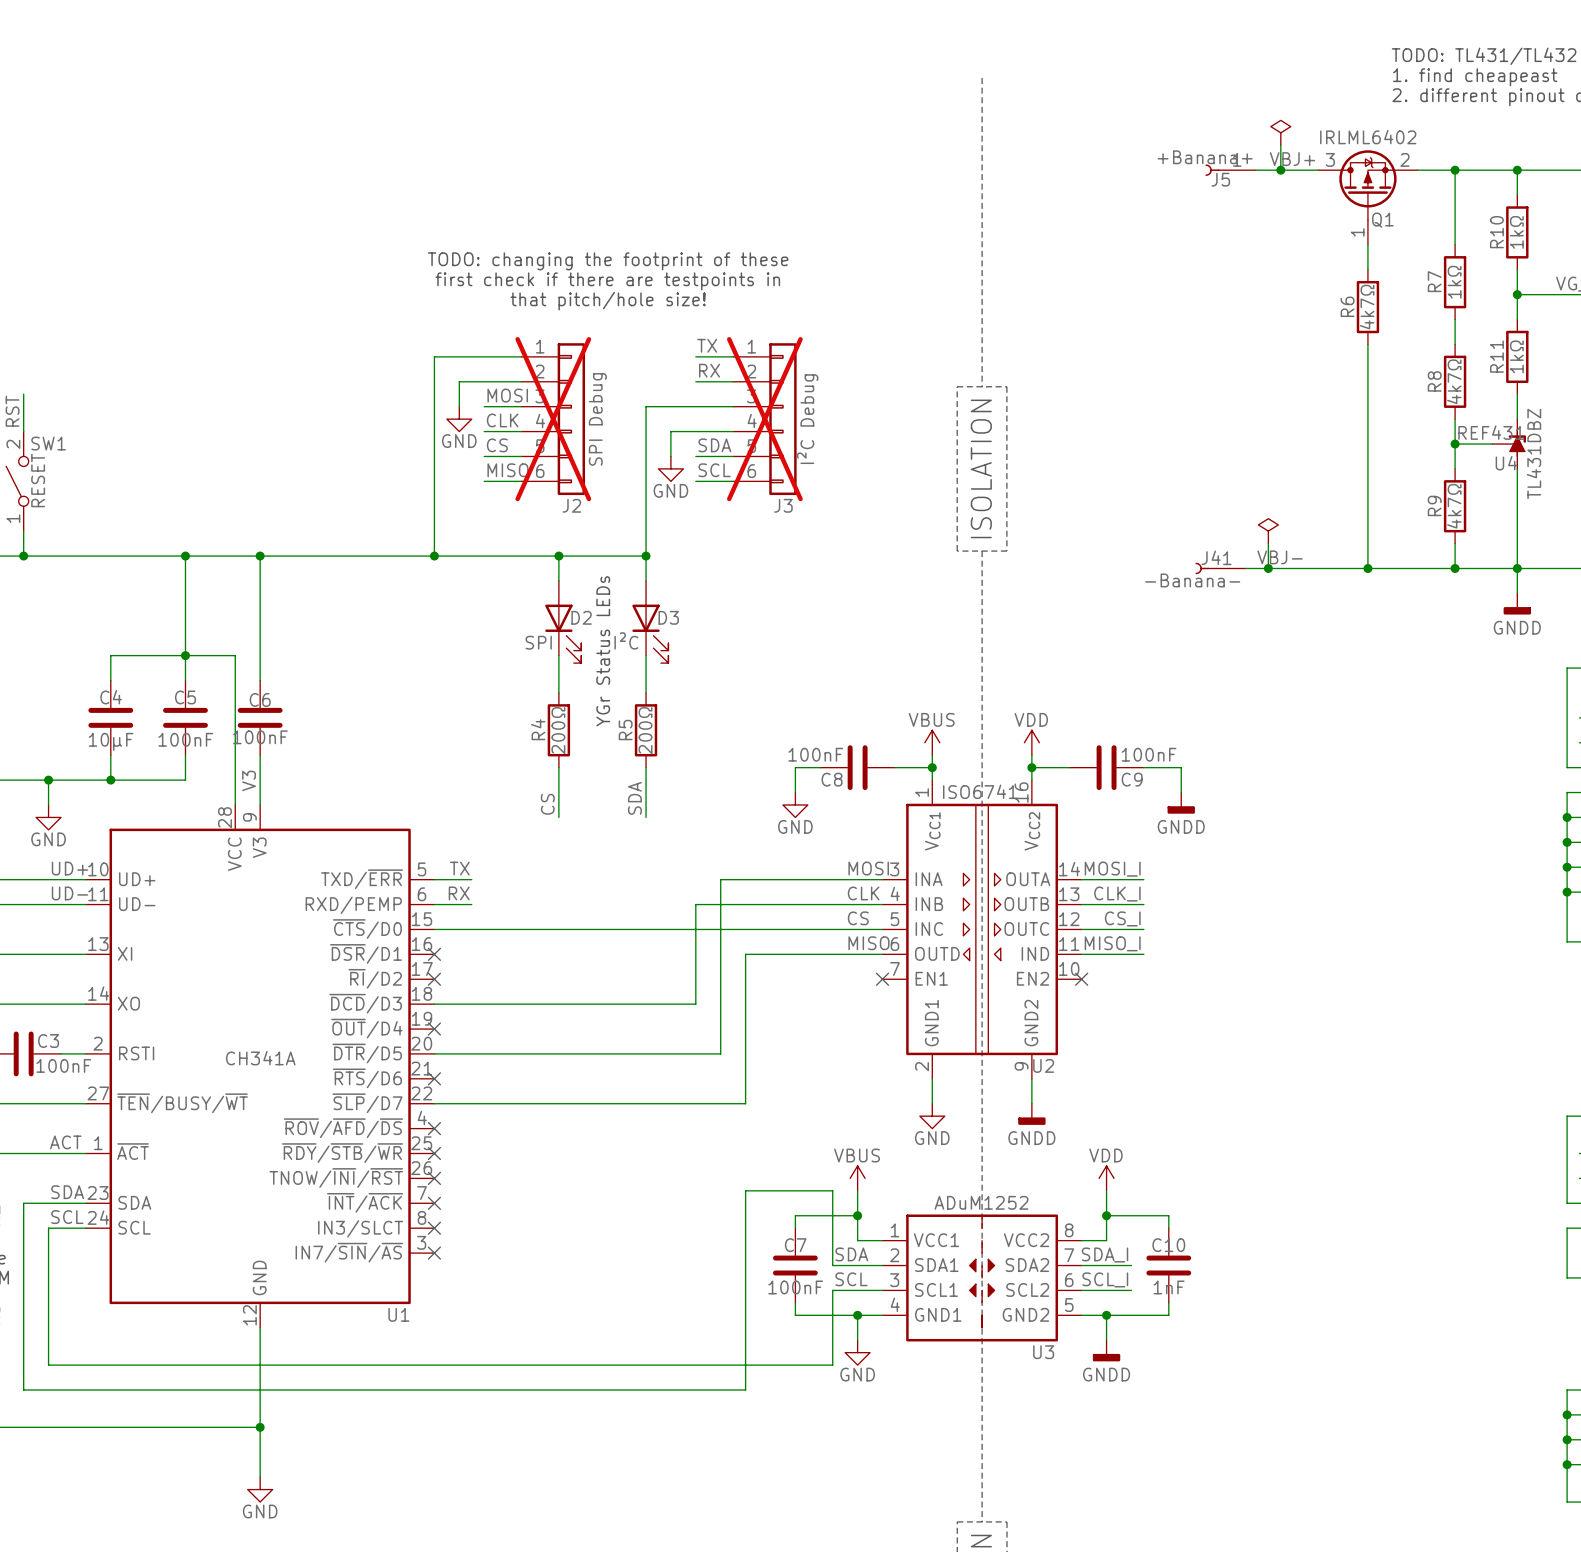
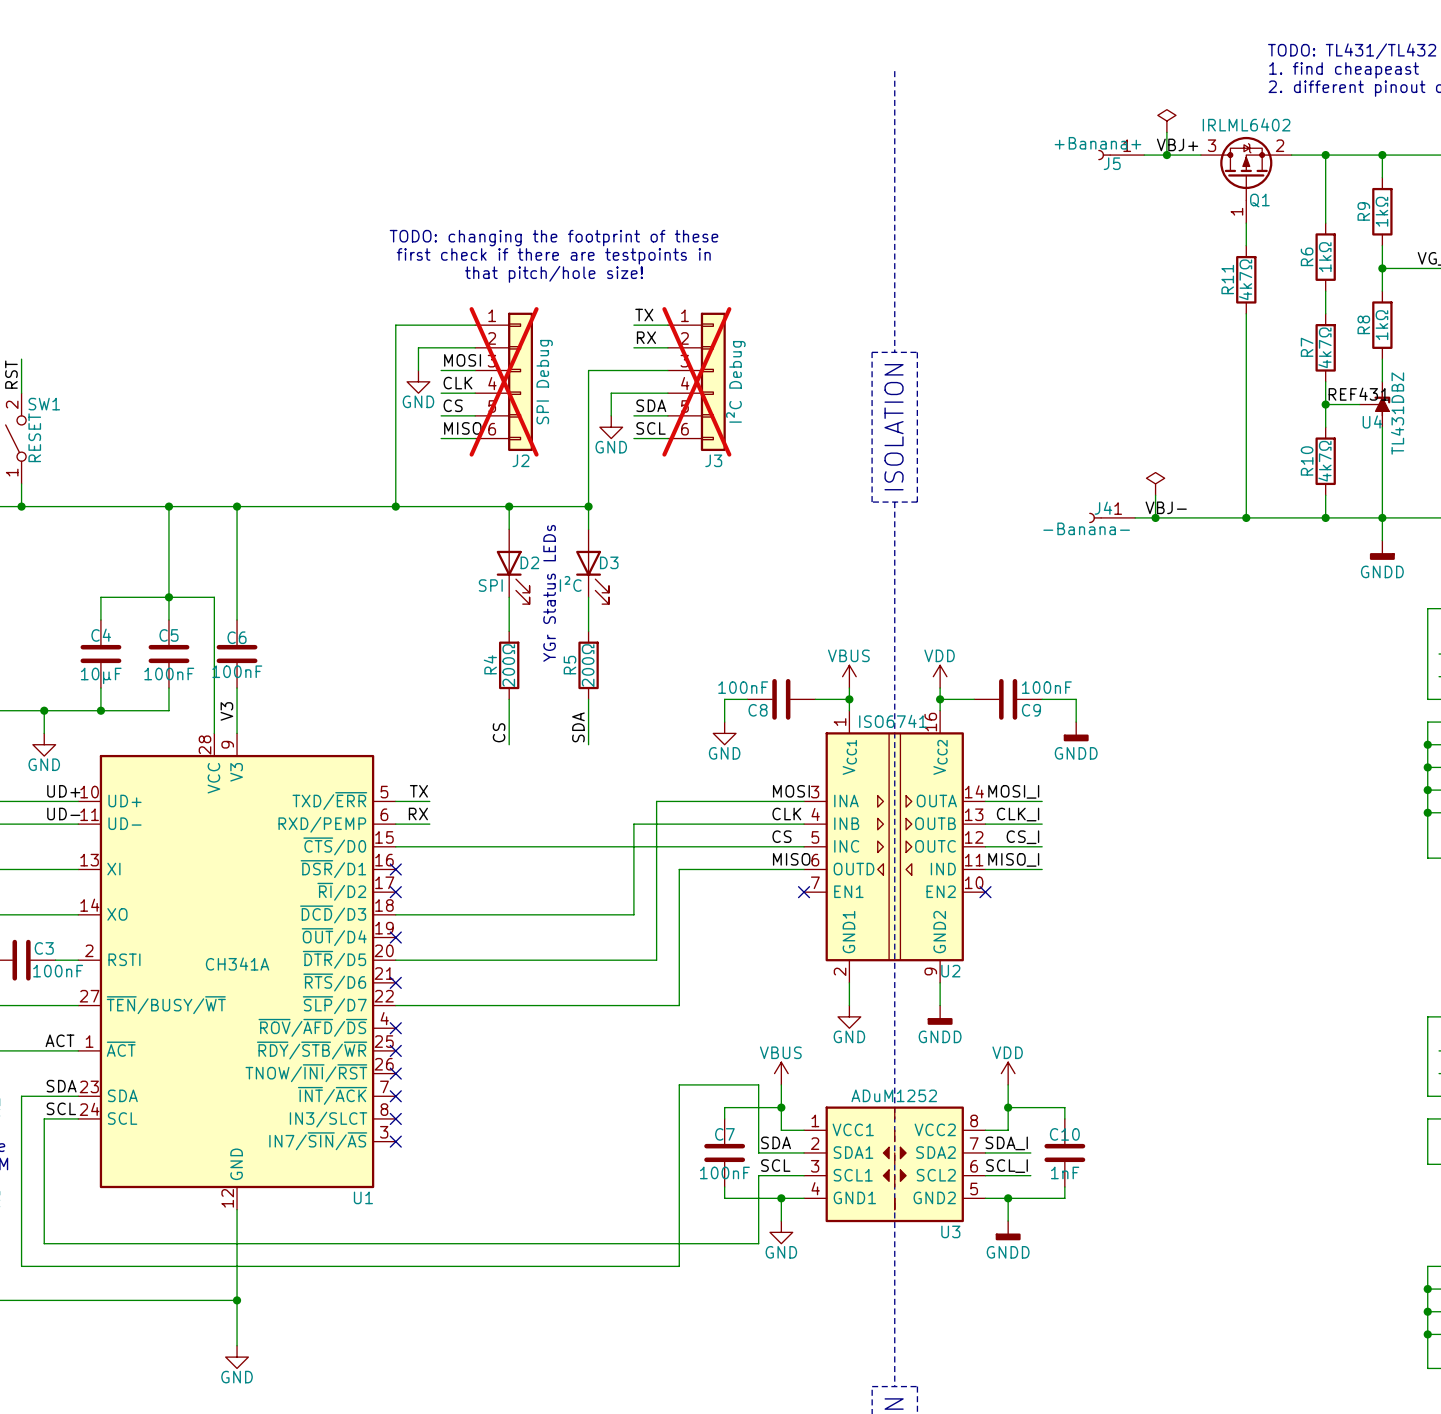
R10 name: R10 (1496, 232) -> R9 (1363, 211)
R7 name: R7 (1434, 281) -> R6 (1307, 256)
R6 name: R6 (1347, 306) -> R11 (1227, 279)
R11 name: R11 (1496, 356) -> R8 (1363, 324)
R8 name: R8 (1434, 381) -> R7 (1307, 347)
R9 name: R9 (1434, 505) -> R10 (1307, 460)

